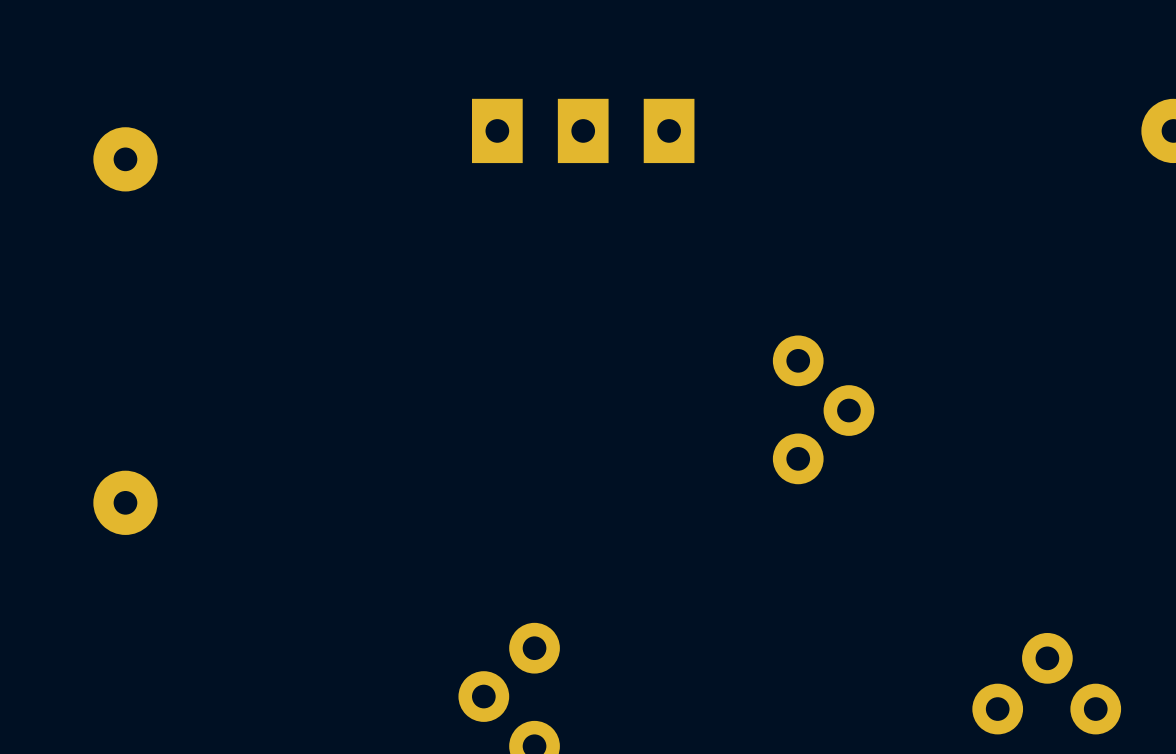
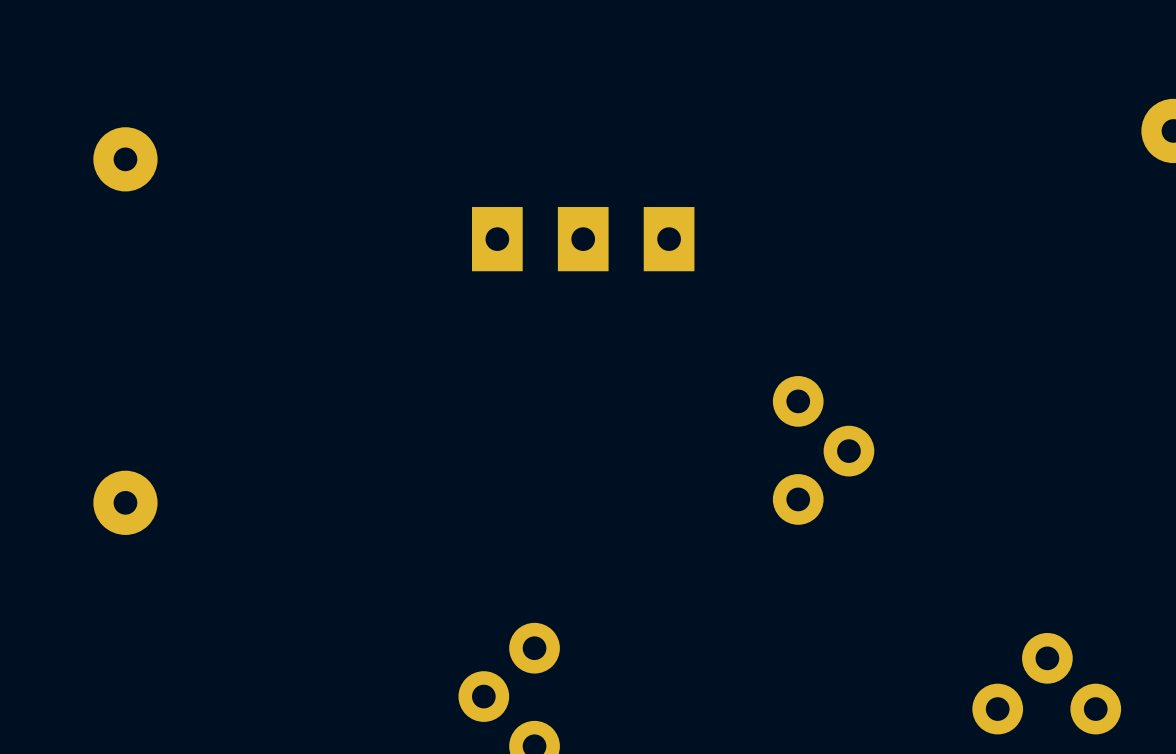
part position: (583, 130) -> (583, 239)
part position: (823, 409) -> (823, 450)

